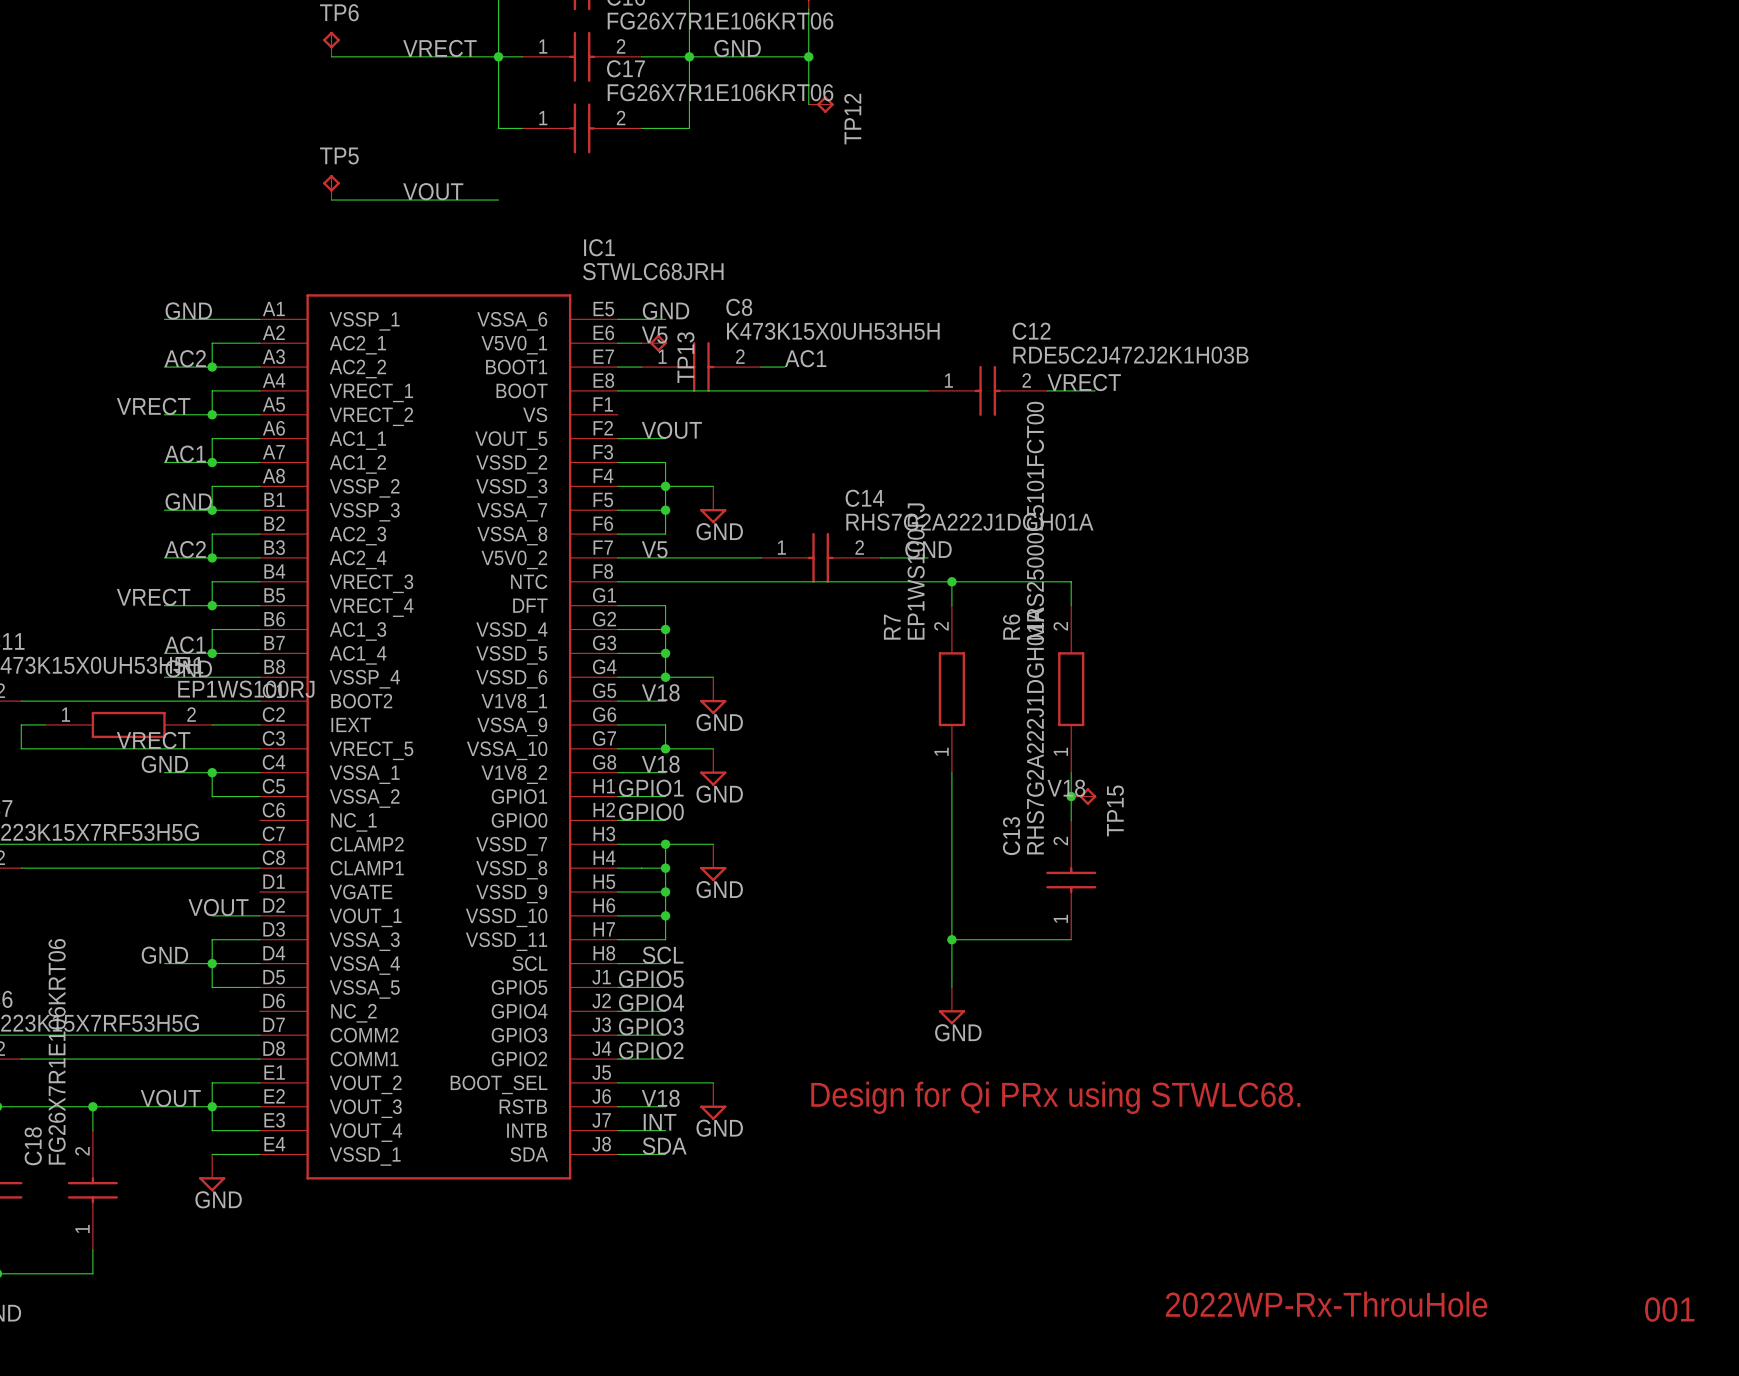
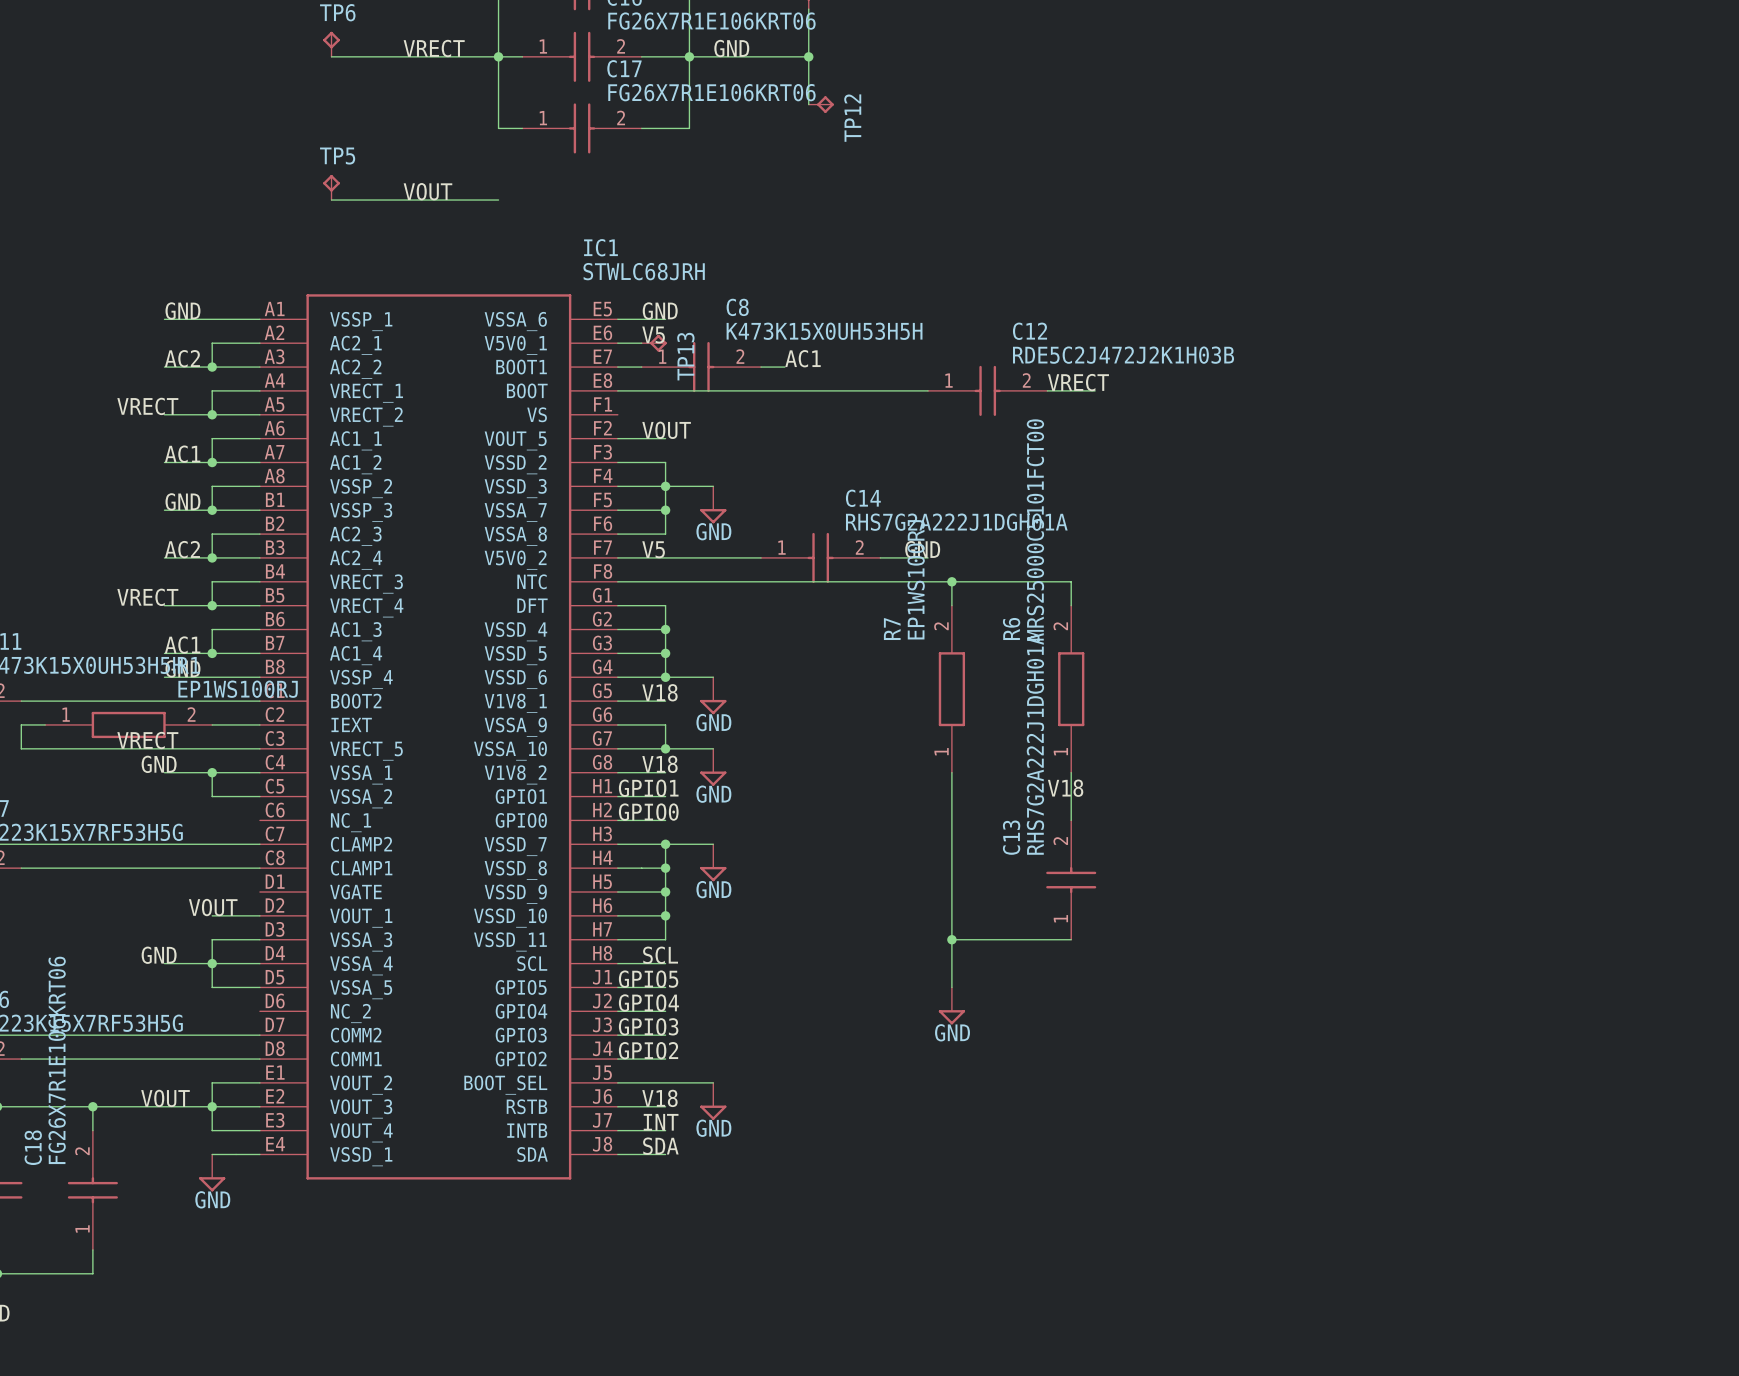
junction: (1071, 796) -> none
TP15: (1083, 796) -> none
text: Design for Qi PRx using STWLC68. (1055, 1097) -> none
text: 2022WP-Rx-ThrouHole (1326, 1304) -> none
text: 001 (1669, 1309) -> none

